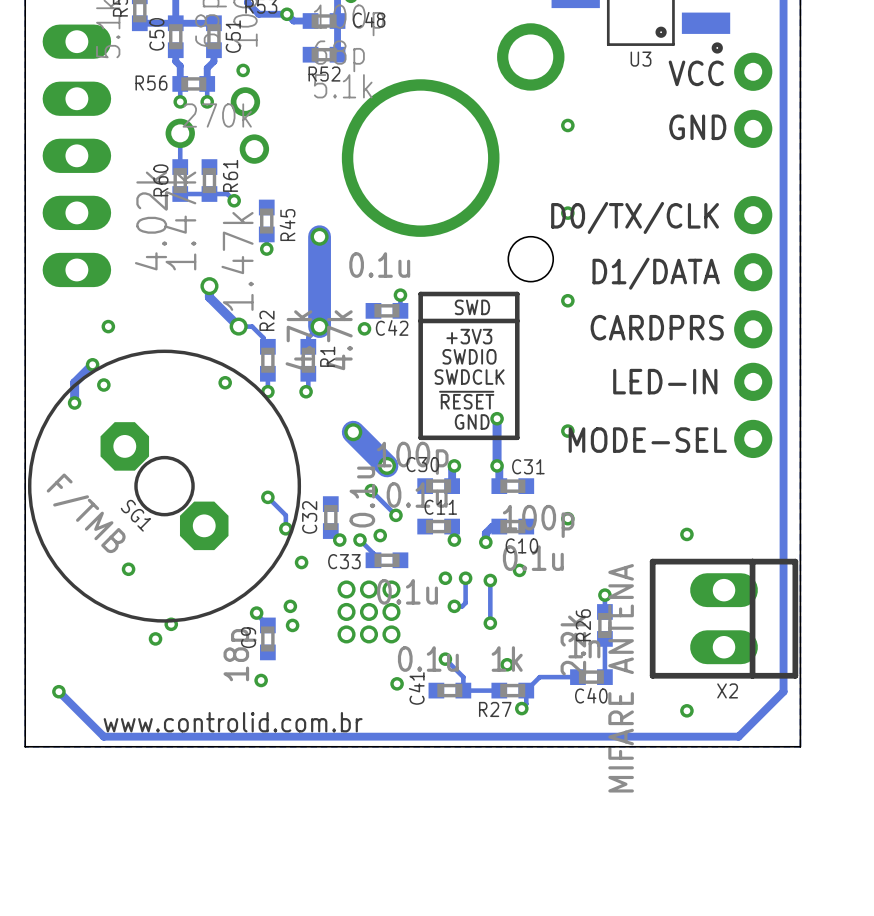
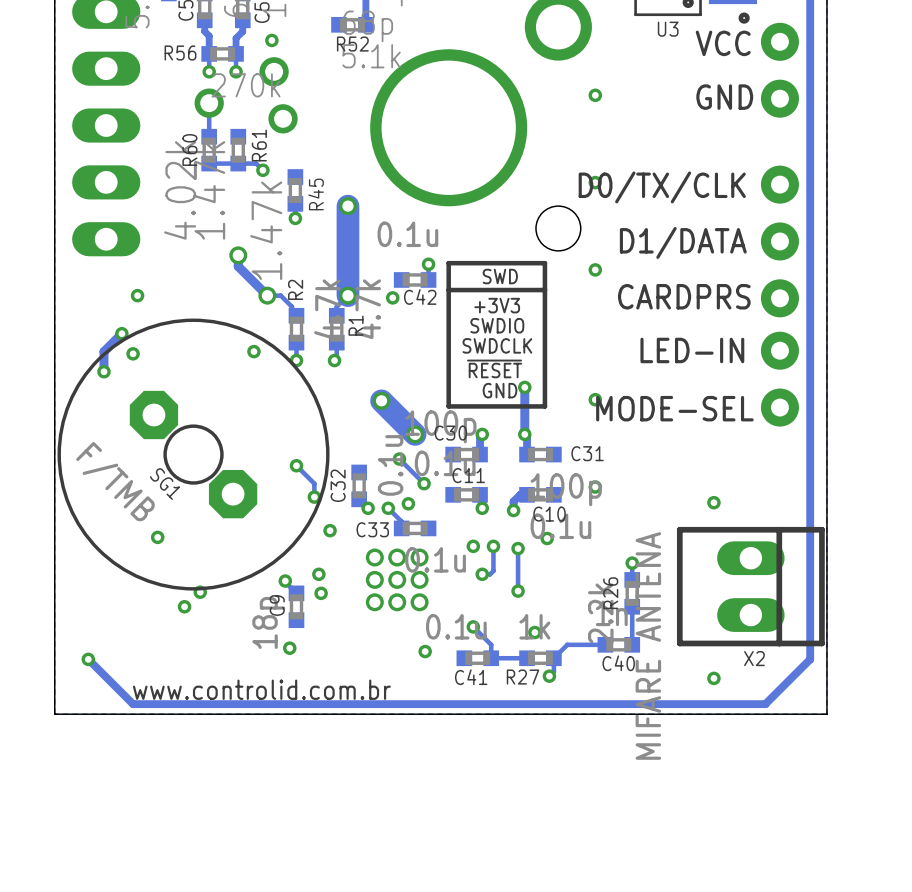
C31 name position: C31 (528, 466) -> C31 (587, 453)
C41 name rotation: 0° (416, 688) -> 90° clockwise (471, 677)

